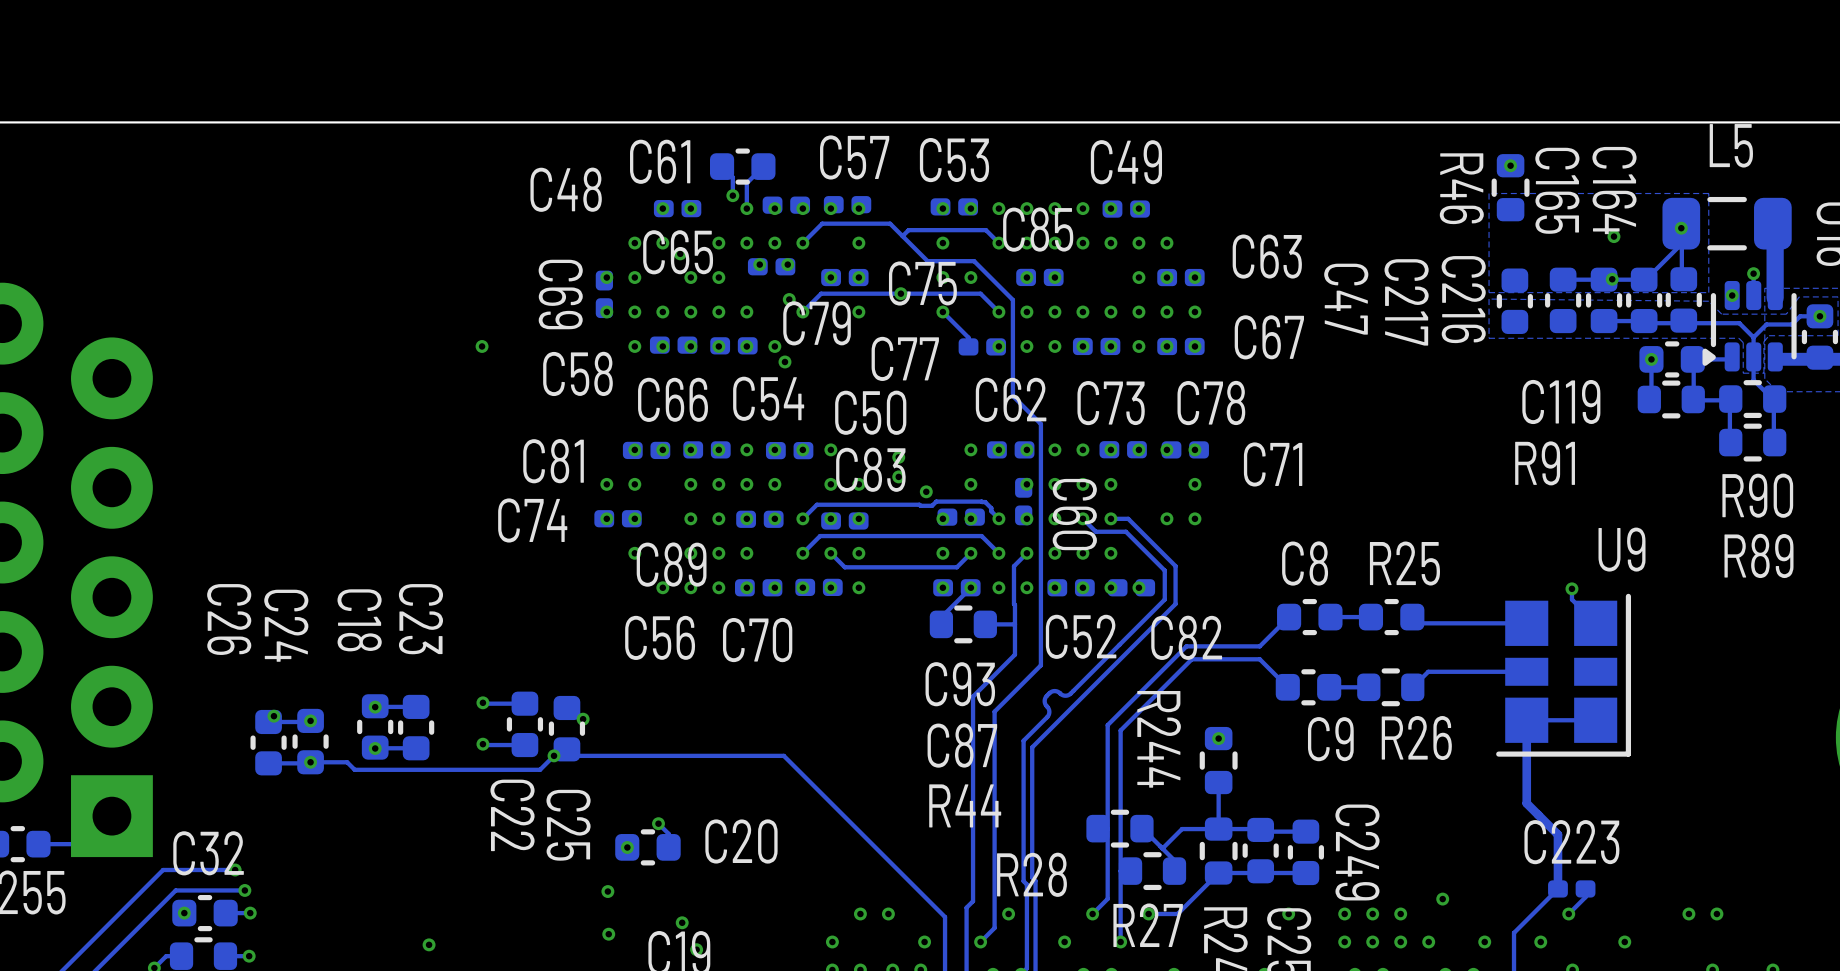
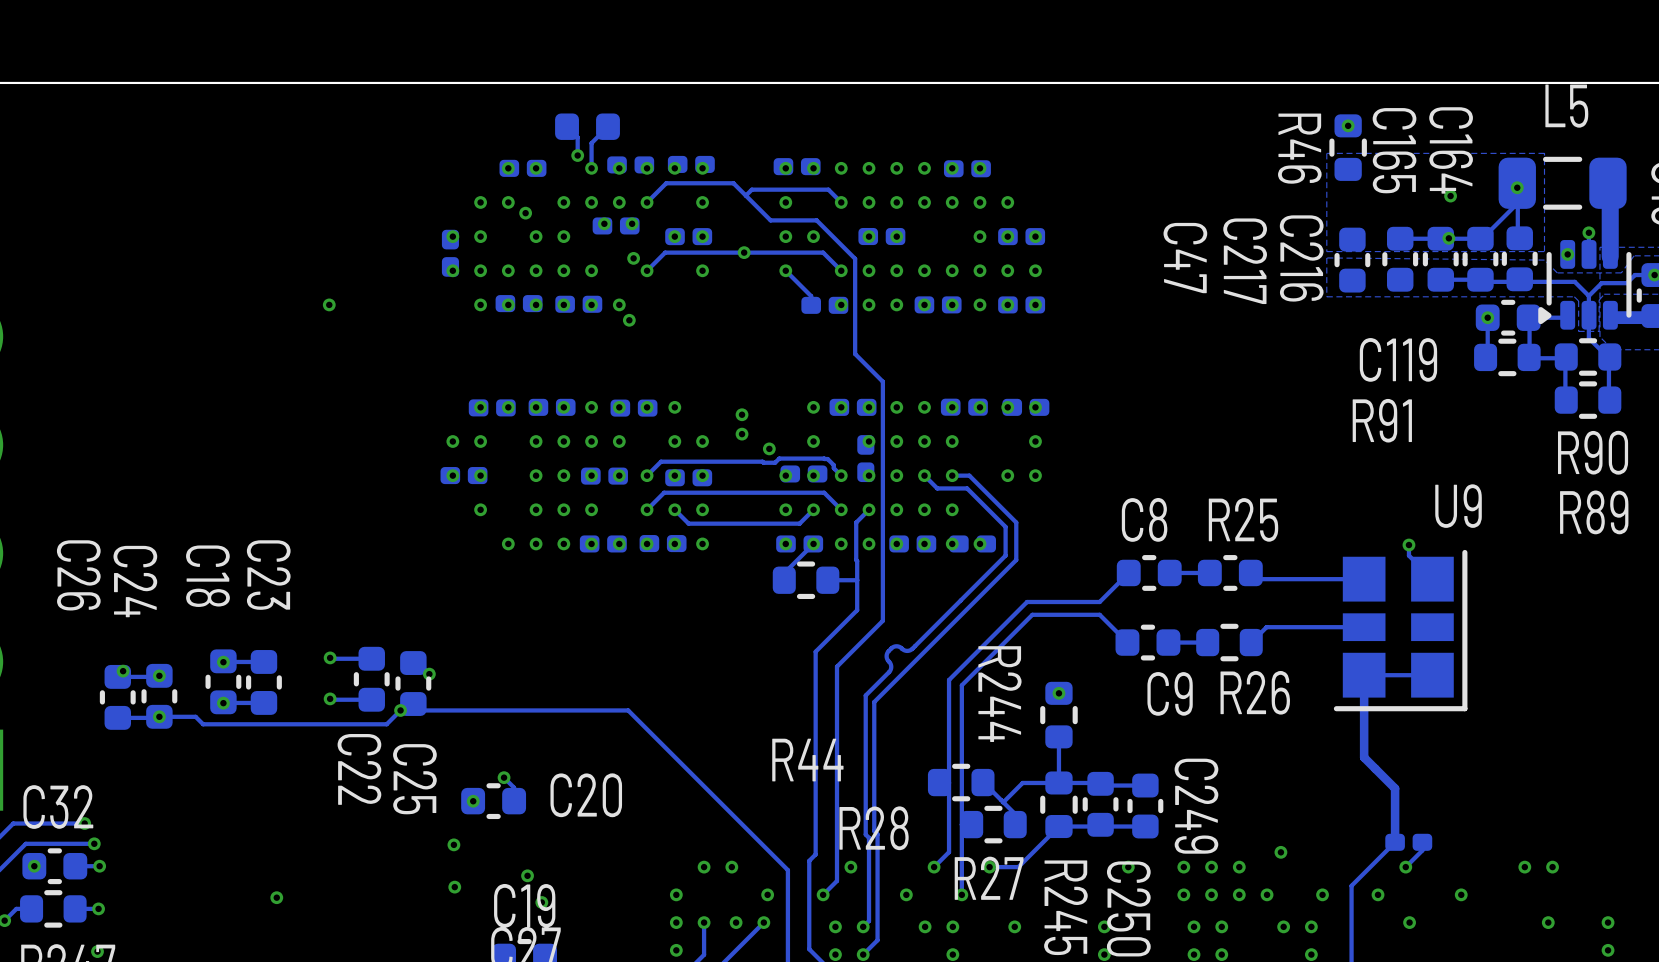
C57 name: C57 (854, 157) -> none
C53 name: C53 (954, 160) -> none
C61 name: C61 (660, 161) -> none
C49 name: C49 (1126, 162) -> none
C48: (742, 166) -> none
C85 name: C85 (1038, 229) -> none
C65 name: C65 (678, 252) -> none
C63 name: C63 (1267, 256) -> none
C75 name: C75 (922, 283) -> none
C69 name: C69 (560, 294) -> none
C79 name: C79 (817, 323) -> none
C67 name: C67 (1269, 337) -> none
C77 name: C77 (905, 358) -> none
C58 name: C58 (577, 373) -> none
C54 name: C54 (768, 398) -> none
C66 name: C66 (673, 399) -> none
C62 name: C62 (1011, 399) -> none
C73 name: C73 (1111, 403) -> none
C78 name: C78 (1211, 403) -> none
C50 name: C50 (870, 412) -> none
C81 name: C81 (553, 461) -> none
C71 name: C71 (1273, 464) -> none
C83 name: C83 (870, 469) -> none
C60 name: C60 (1074, 514) -> none
C74 name: C74 (532, 520) -> none
C89 name: C89 (671, 564) -> none
C52 name: C52 (1081, 636) -> none
C56 name: C56 (660, 637) -> none
C82 name: C82 (1186, 637) -> none
C70 name: C70 (757, 640) -> none
C93 name: C93 (960, 684) -> none
C87 name: C87 (962, 745) -> none
C223 name: C223 (1571, 842) -> none

